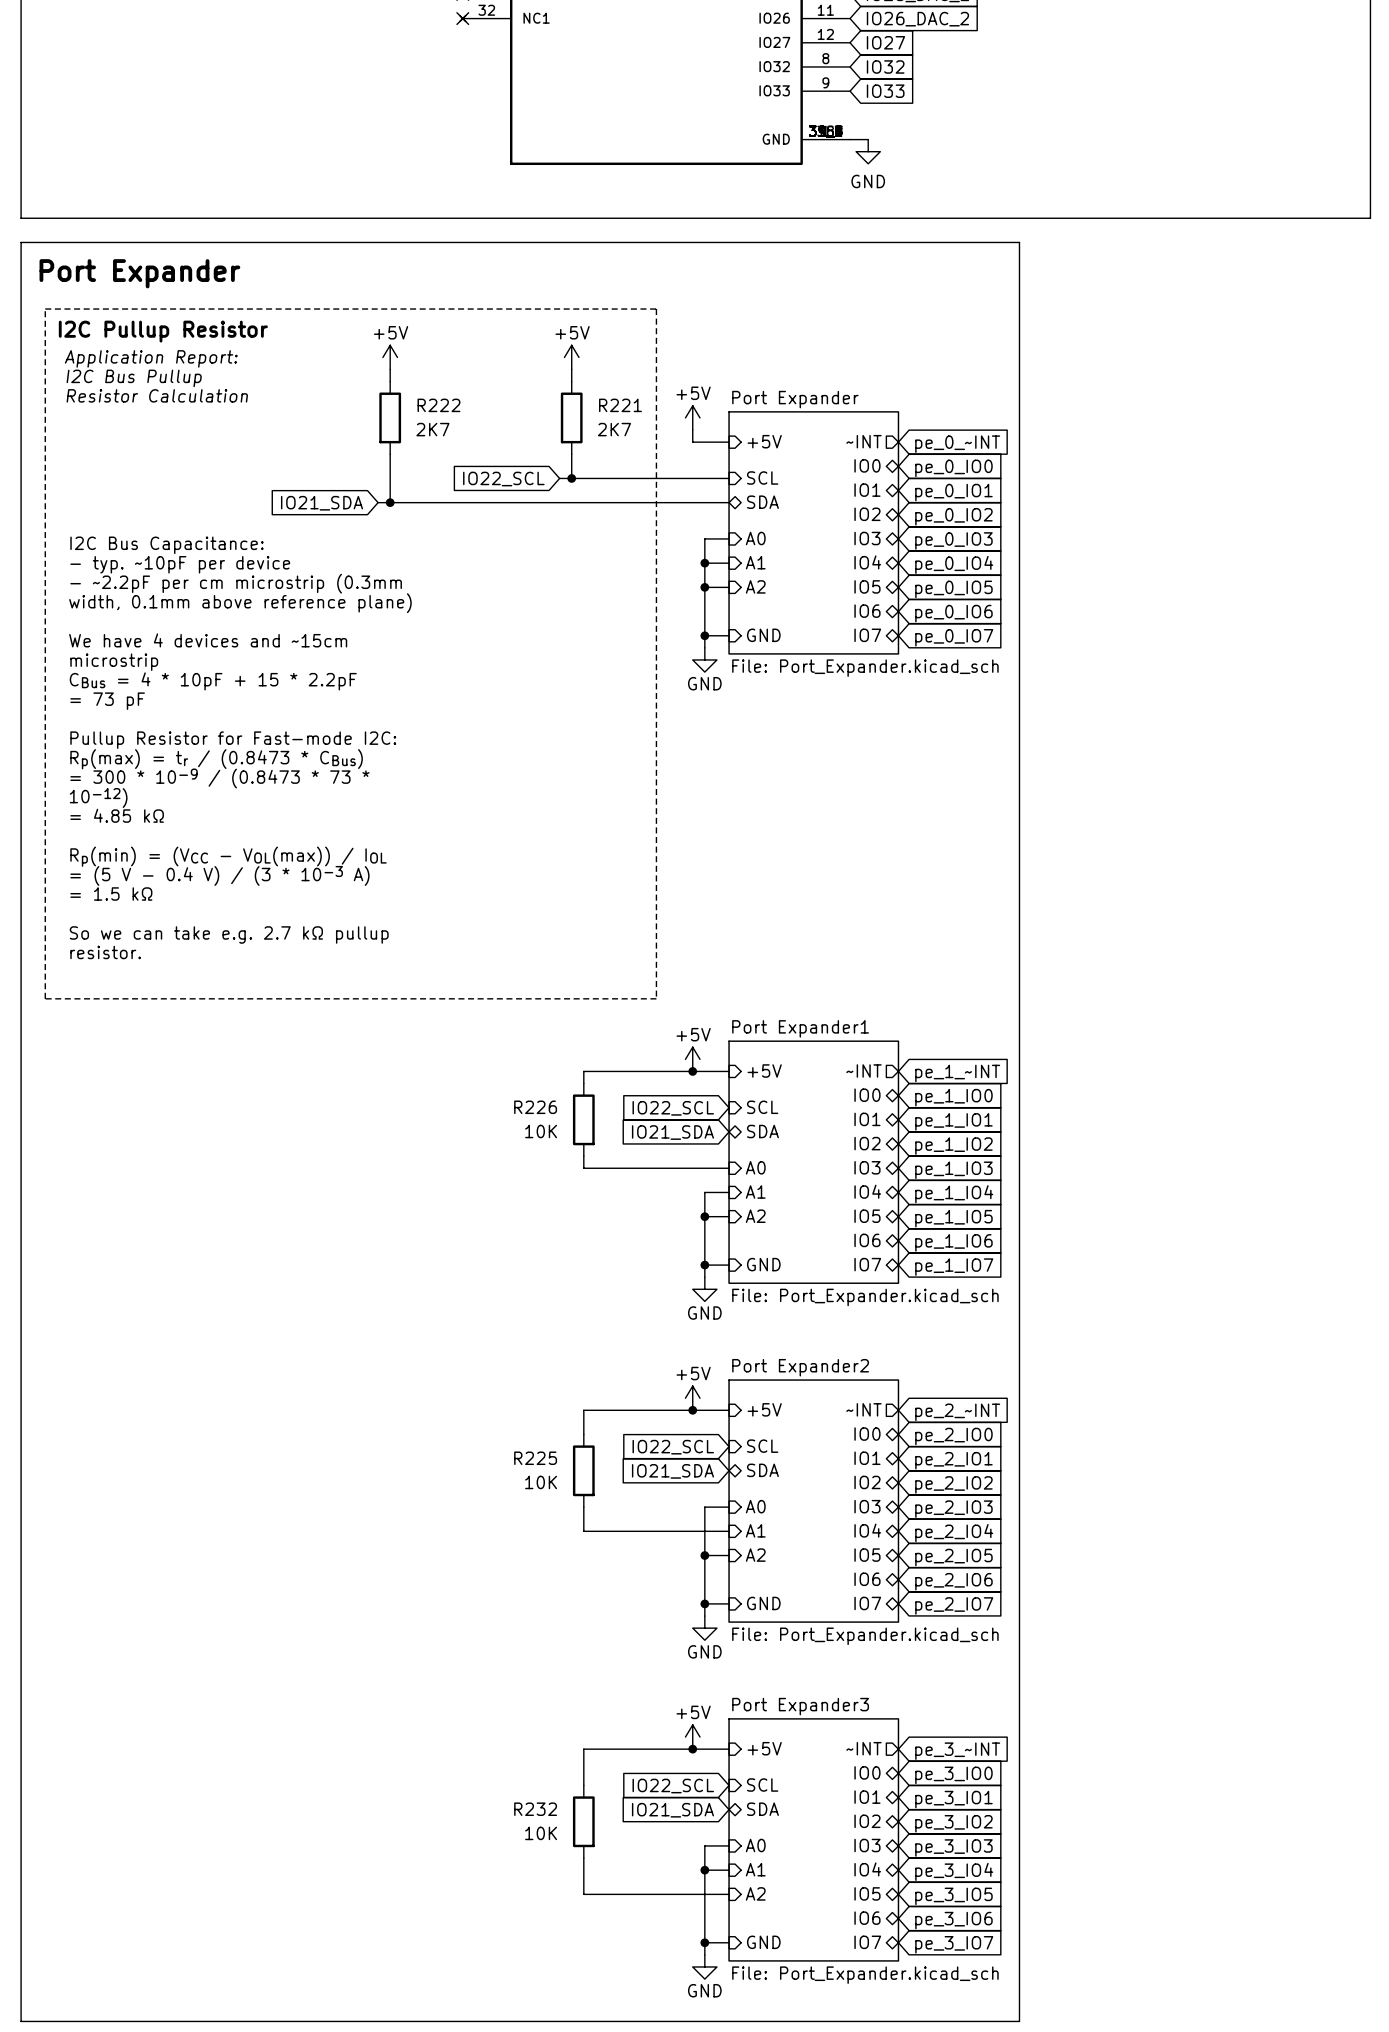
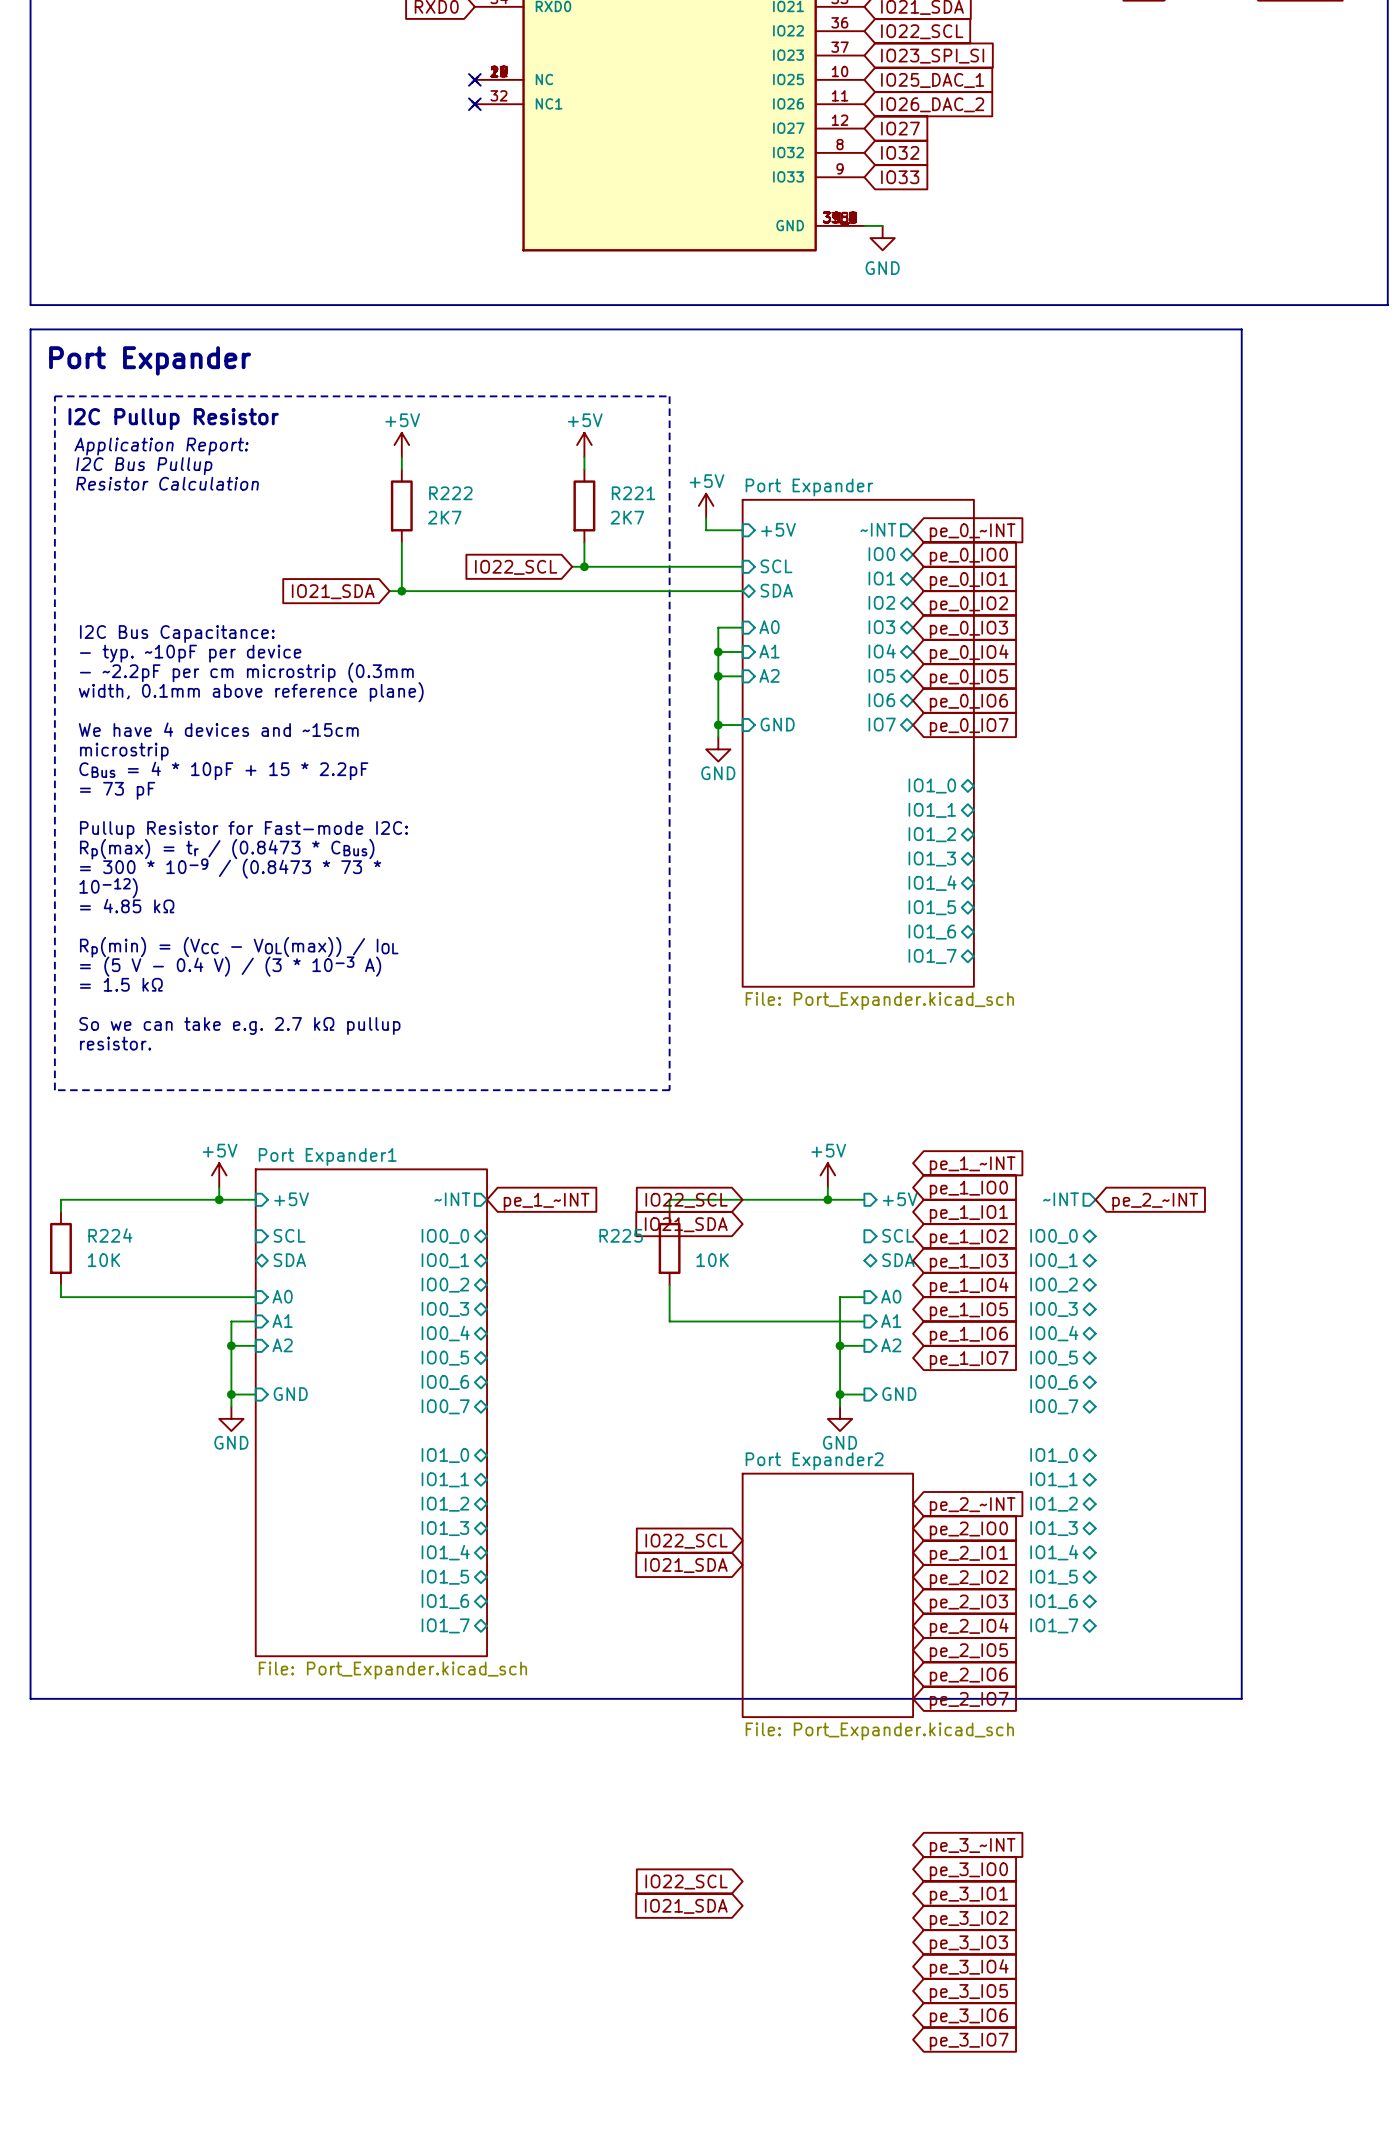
line: (1019, 242) (1019, 2021) (21, 2021) (21, 1603) -> (1034, 329) (1241, 329) (1241, 1698) (30, 1698)
sheet Port Expander: File: Port_Expander.kicad_sch (813, 532) -> none
sheet Port Expander: none -> File: Port_Expander.kicad_sch (858, 743)
sheet pin: none -> IO1_0 (932, 786)
sheet pin: none -> IO1_1 (932, 810)
sheet pin: none -> IO1_2 (932, 834)
sheet pin: none -> IO1_3 (932, 859)
sheet pin: none -> IO1_4 (932, 883)
sheet pin: none -> IO1_5 (932, 907)
sheet pin: none -> IO1_6 (932, 932)
sheet pin: none -> IO1_7 (932, 956)
sheet Port Expander1 name position: Port Expander1 (800, 1028) -> Port Expander1 (327, 1156)
sheet Port Expander1 shape: [728, 1040, 900, 1284] -> [255, 1168, 488, 1657]
power symbol position: +5V (692, 1059) -> +5V (827, 1175)
sheet pin position: +5V (764, 1070) -> +5V (900, 1199)
sheet pin: ~INT (863, 1070) -> none
junction: (692, 1071) -> none
wire: (729, 1071) (583, 1071) (583, 1083) -> none
power symbol: none -> +5V (219, 1175)
wire: none -> (219, 1187) (219, 1199)
wire: none -> (827, 1187) (827, 1199)
sheet pin: IO0 (867, 1095) -> none
junction: none -> (219, 1199)
wire: none -> (255, 1199) (60, 1199) (60, 1211)
sheet pin: none -> +5V (291, 1199)
sheet pin: none -> ~INT (452, 1199)
sheet pin position: SCL (762, 1107) -> SCL (898, 1235)
junction: none -> (827, 1199)
wire: none -> (864, 1199) (669, 1199) (669, 1211)
sheet pin: none -> ~INT (1060, 1199)
global label: none -> pe_1_~INT (546, 1201)
global label: none -> pe_2_~INT (1155, 1201)
R226: 10K (583, 1119) -> none
sheet pin: IO1 (867, 1119) -> none
sheet pin position: SDA (762, 1131) -> SDA (898, 1260)
sheet pin: none -> SCL (289, 1235)
sheet pin: IO2 (867, 1143) -> none
sheet pin: none -> IO0_0 (445, 1236)
sheet pin: none -> IO0_0 (1054, 1236)
R224: none -> 10K (60, 1248)
wire: (583, 1156) (583, 1168) (729, 1168) -> none
sheet pin: none -> SDA (289, 1260)
sheet pin position: A0 (755, 1167) -> A0 (891, 1296)
sheet pin: IO3 (867, 1167) -> none
sheet pin: none -> IO0_1 (445, 1260)
sheet pin: none -> IO0_1 (1054, 1260)
sheet pin: IO4 (867, 1191) -> none
wire: none -> (60, 1284) (60, 1297) (255, 1297)
sheet pin: none -> IO0_2 (445, 1285)
wire: none -> (669, 1284) (669, 1321) (864, 1321)
wire: (729, 1192) (704, 1192) (704, 1277) -> none
sheet pin position: A1 (755, 1192) -> A1 (891, 1321)
sheet pin: none -> IO0_2 (1054, 1285)
sheet pin: none -> A0 (282, 1296)
wire: none -> (864, 1297) (840, 1297) (840, 1406)
sheet pin: none -> IO0_3 (445, 1309)
wire: (704, 1216) (729, 1216) -> (840, 1345) (864, 1345)
junction: (704, 1216) -> none
sheet pin position: A2 (755, 1216) -> A2 (891, 1345)
sheet pin: IO5 (867, 1216) -> none
sheet pin: none -> IO0_3 (1054, 1309)
wire: none -> (255, 1321) (231, 1321) (231, 1406)
sheet pin: none -> A1 (282, 1321)
sheet pin: none -> IO0_4 (445, 1333)
sheet pin: IO6 (867, 1240) -> none
sheet pin: none -> IO0_4 (1054, 1333)
wire: none -> (231, 1345) (255, 1345)
junction: none -> (231, 1345)
sheet pin: none -> A2 (282, 1345)
junction: none -> (840, 1345)
sheet pin position: GND (763, 1264) -> GND (899, 1394)
sheet pin: IO7 (867, 1264) -> none
sheet pin: none -> IO0_5 (445, 1358)
wire: (704, 1265) (729, 1265) -> (840, 1394) (864, 1394)
junction: (704, 1265) -> none
sheet pin: none -> IO0_5 (1054, 1358)
sheet pin: none -> IO0_6 (445, 1382)
power symbol position: GND (704, 1289) -> GND (840, 1418)
sheet pin: none -> IO0_6 (1054, 1382)
sheet Port Expander1 value position: File: Port_Expander.kicad_sch (865, 1297) -> File: Port_Expander.kicad_sch (392, 1670)
sheet pin: none -> GND (290, 1394)
wire: none -> (231, 1394) (255, 1394)
junction: none -> (231, 1394)
junction: none -> (840, 1394)
sheet pin: none -> IO0_7 (445, 1406)
sheet pin: none -> IO0_7 (1054, 1406)
power symbol: none -> GND (231, 1418)
sheet pin: none -> IO1_0 (445, 1455)
sheet pin: none -> IO1_0 (1054, 1455)
sheet pin: none -> IO1_1 (445, 1479)
sheet pin: none -> IO1_1 (1054, 1479)
power symbol: +5V (692, 1398) -> none
sheet pin: +5V (764, 1409) -> none
sheet pin: ~INT (863, 1409) -> none
sheet pin: none -> IO1_2 (445, 1504)
junction: (692, 1410) -> none
wire: (729, 1410) (583, 1410) (583, 1434) -> none
sheet pin: none -> IO1_2 (1054, 1504)
sheet pin: none -> IO1_3 (445, 1528)
sheet pin: IO0 (867, 1434) -> none
sheet pin: none -> IO1_3 (1054, 1528)
sheet pin: SCL (762, 1446) -> none
sheet pin: none -> IO1_4 (445, 1552)
sheet pin: IO1 (867, 1458) -> none
sheet pin: none -> IO1_4 (1054, 1552)
R225 position: (583, 1470) -> (669, 1248)
sheet pin: SDA (762, 1470) -> none
R225 value position: 10K (541, 1482) -> 10K (712, 1260)
sheet pin: IO2 (867, 1482) -> none
sheet pin: none -> IO1_5 (445, 1577)
sheet pin: none -> IO1_5 (1054, 1577)
sheet pin: A0 (755, 1506) -> none
sheet pin: IO3 (867, 1506) -> none
sheet pin: none -> IO1_6 (445, 1601)
wire: (583, 1507) (583, 1531) (729, 1531) -> none
wire: (729, 1507) (704, 1507) (704, 1616) -> none
sheet pin: none -> IO1_6 (1054, 1601)
sheet pin: A1 (755, 1530) -> none
sheet pin: IO4 (867, 1530) -> none
sheet pin: none -> IO1_7 (445, 1625)
sheet pin: none -> IO1_7 (1054, 1625)
wire: (704, 1555) (729, 1555) -> none
junction: (704, 1555) -> none
sheet pin: A2 (755, 1555) -> none
sheet pin: IO5 (867, 1555) -> none
sheet pin: IO6 (867, 1579) -> none
junction: (704, 1603) -> none
sheet pin: GND (763, 1603) -> none
sheet pin: IO7 (867, 1603) -> none
power symbol: GND (704, 1628) -> none
power symbol: +5V (692, 1737) -> none
sheet pin: +5V (764, 1748) -> none
sheet pin: ~INT (863, 1748) -> none
junction: (692, 1749) -> none
wire: (729, 1749) (583, 1749) (583, 1785) -> none
sheet pin: IO0 (867, 1772) -> none
sheet pin: SCL (762, 1785) -> none
sheet pin: IO1 (867, 1797) -> none
sheet pin: SDA (762, 1809) -> none
R232: 10K (583, 1821) -> none
sheet pin: IO2 (867, 1821) -> none
sheet Port Expander3: File: Port_Expander.kicad_sch (813, 1839) -> none
wire: (729, 1845) (704, 1845) (704, 1954) -> none
sheet pin: A0 (755, 1845) -> none
sheet pin: IO3 (867, 1845) -> none
wire: (583, 1858) (583, 1894) (729, 1894) -> none
sheet pin: A1 (755, 1869) -> none
sheet pin: IO4 (867, 1869) -> none
wire: (704, 1870) (729, 1870) -> none
junction: (704, 1870) -> none
sheet pin: A2 (755, 1893) -> none
sheet pin: IO5 (867, 1893) -> none
sheet pin: IO6 (867, 1918) -> none
wire: (704, 1942) (729, 1942) -> none
junction: (704, 1942) -> none
sheet pin: GND (763, 1942) -> none
sheet pin: IO7 (867, 1942) -> none
power symbol: GND (704, 1966) -> none

